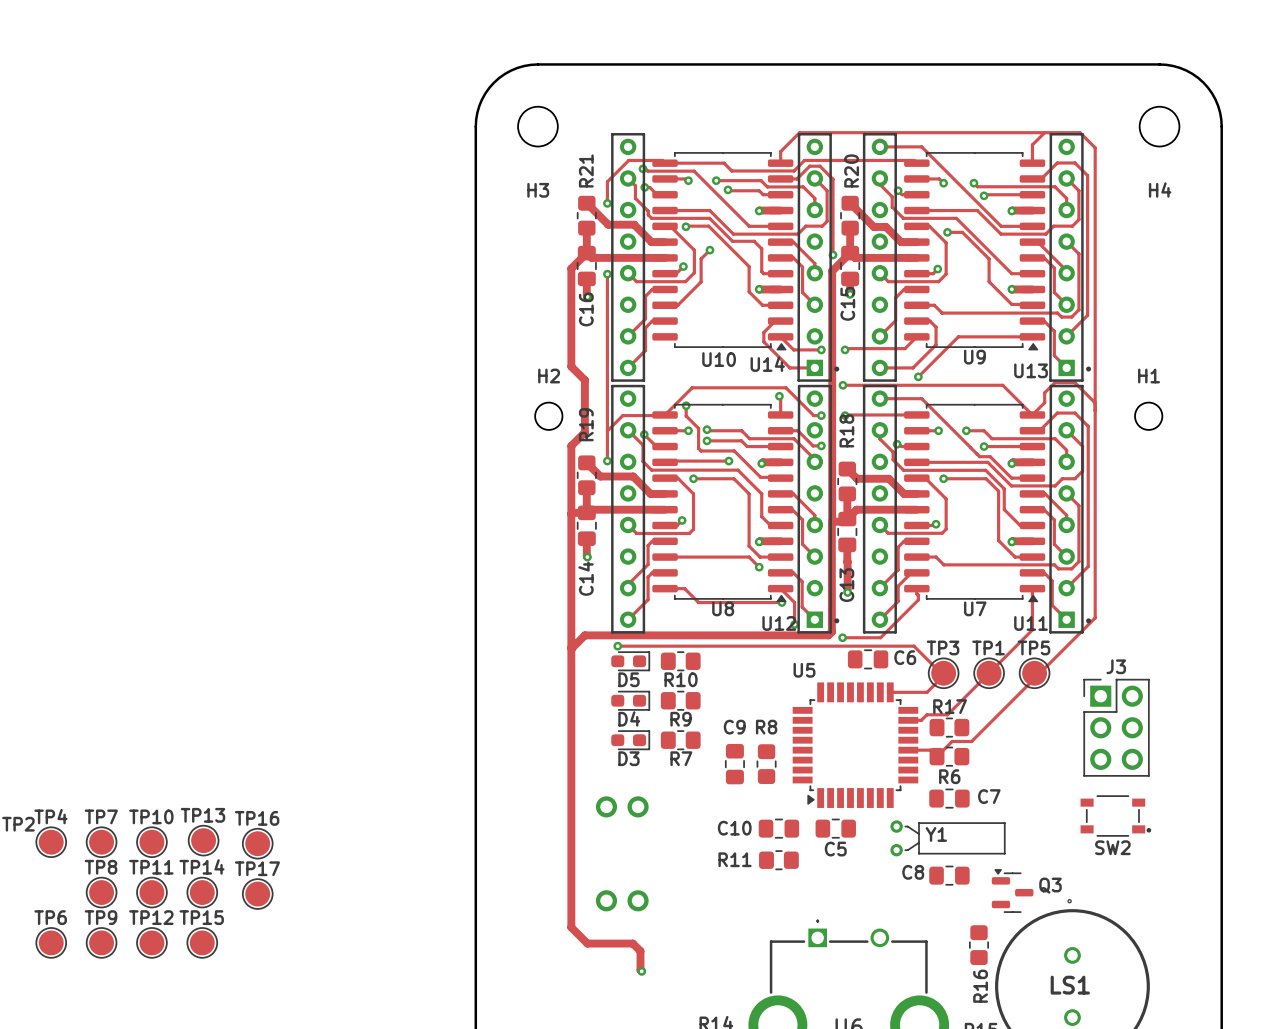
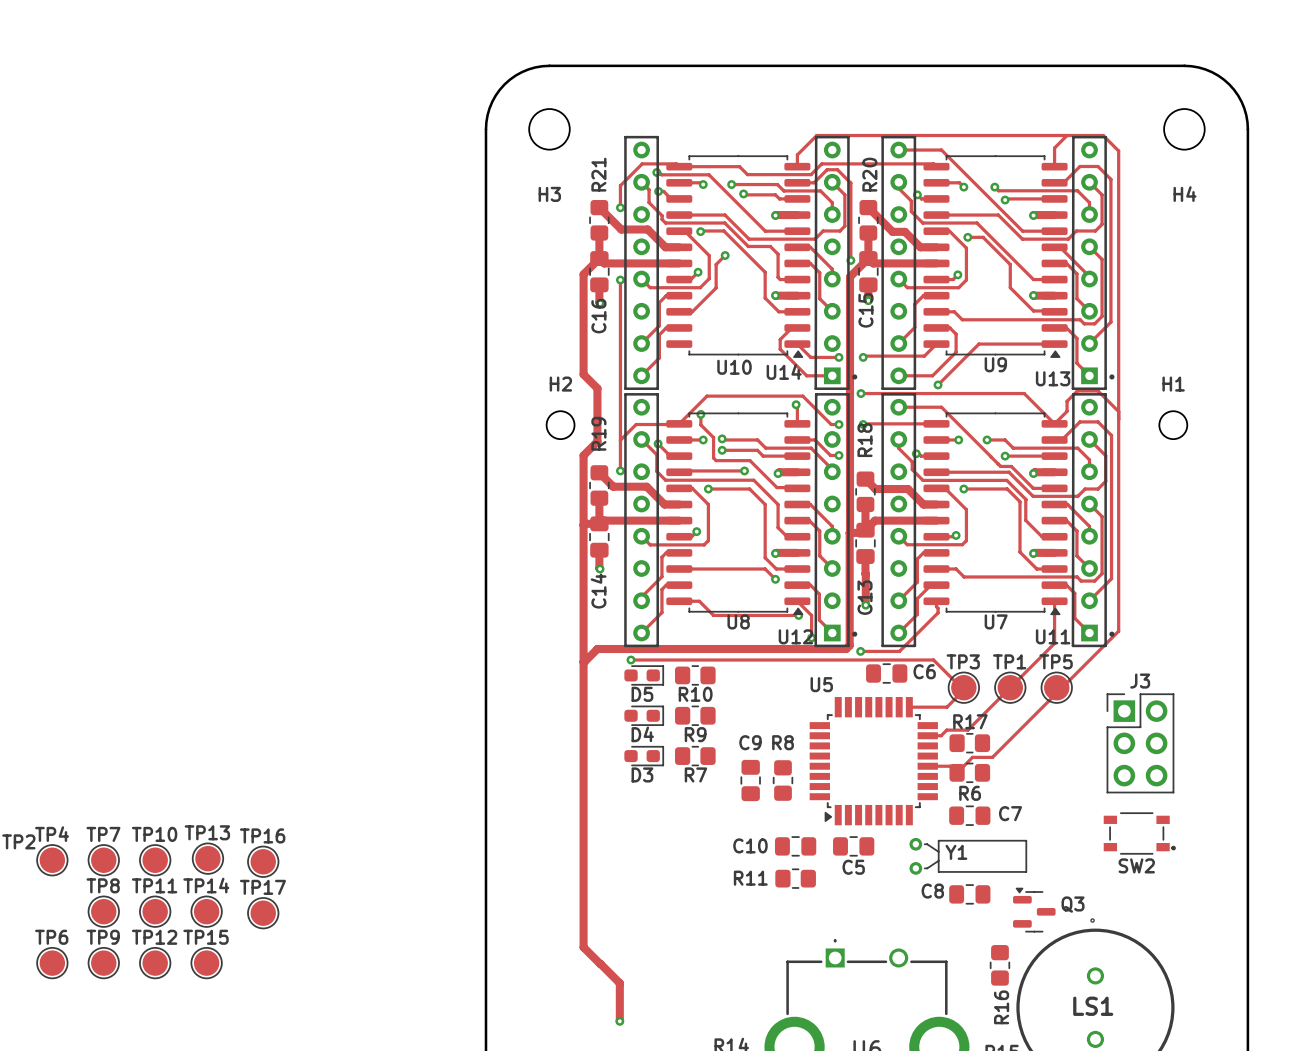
part: (622, 806) -> none
part: (622, 900) -> none
track: (587, 943) (632, 943) (640, 951) (641, 971) -> (600, 963) (619, 983) (619, 1021)
via position: (641, 971) -> (619, 1021)

